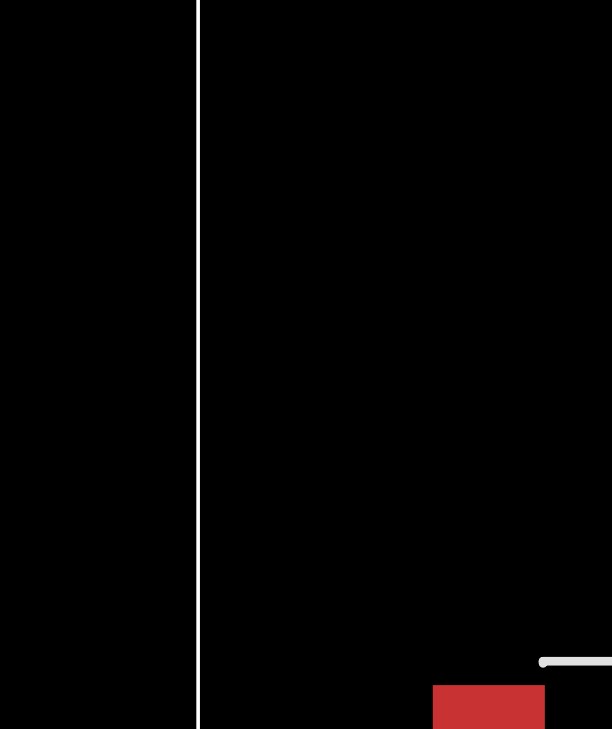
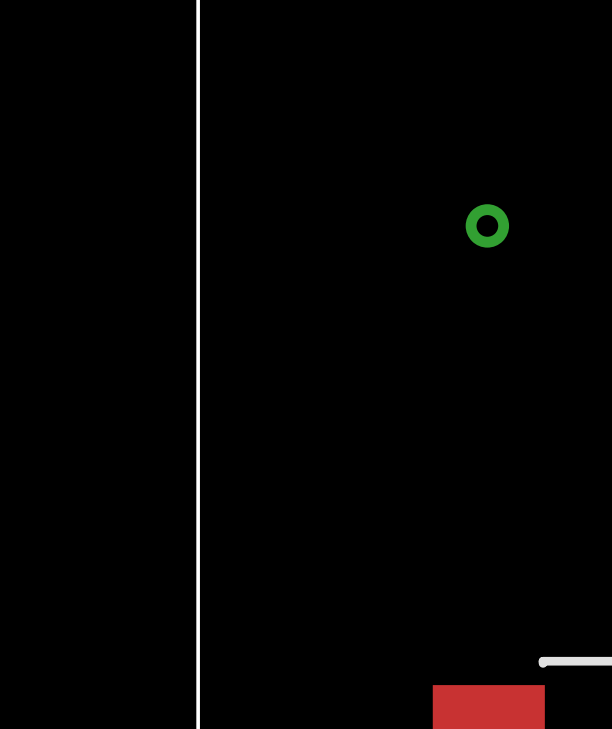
via: none -> (487, 225)

